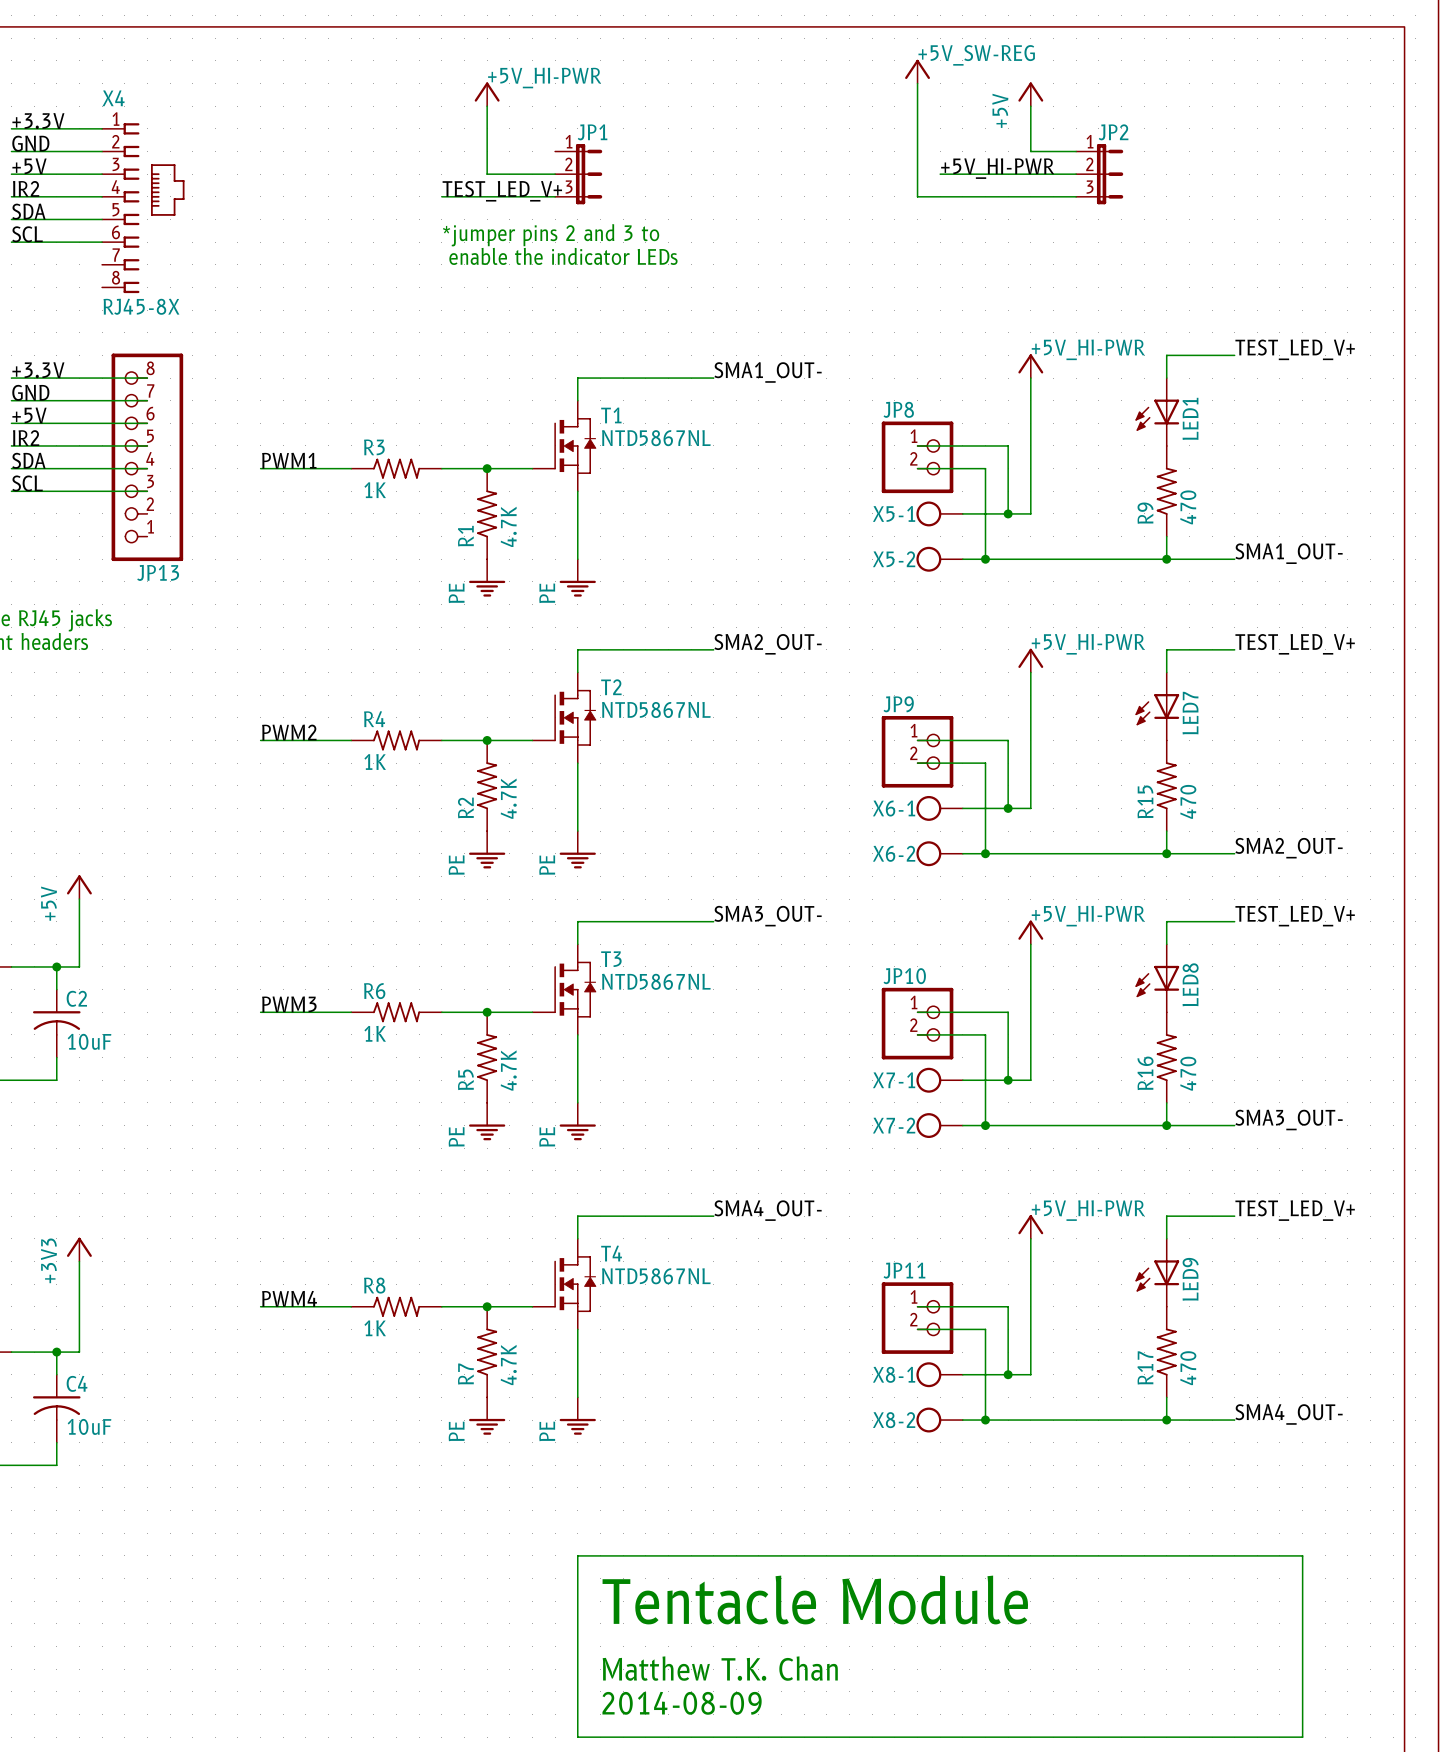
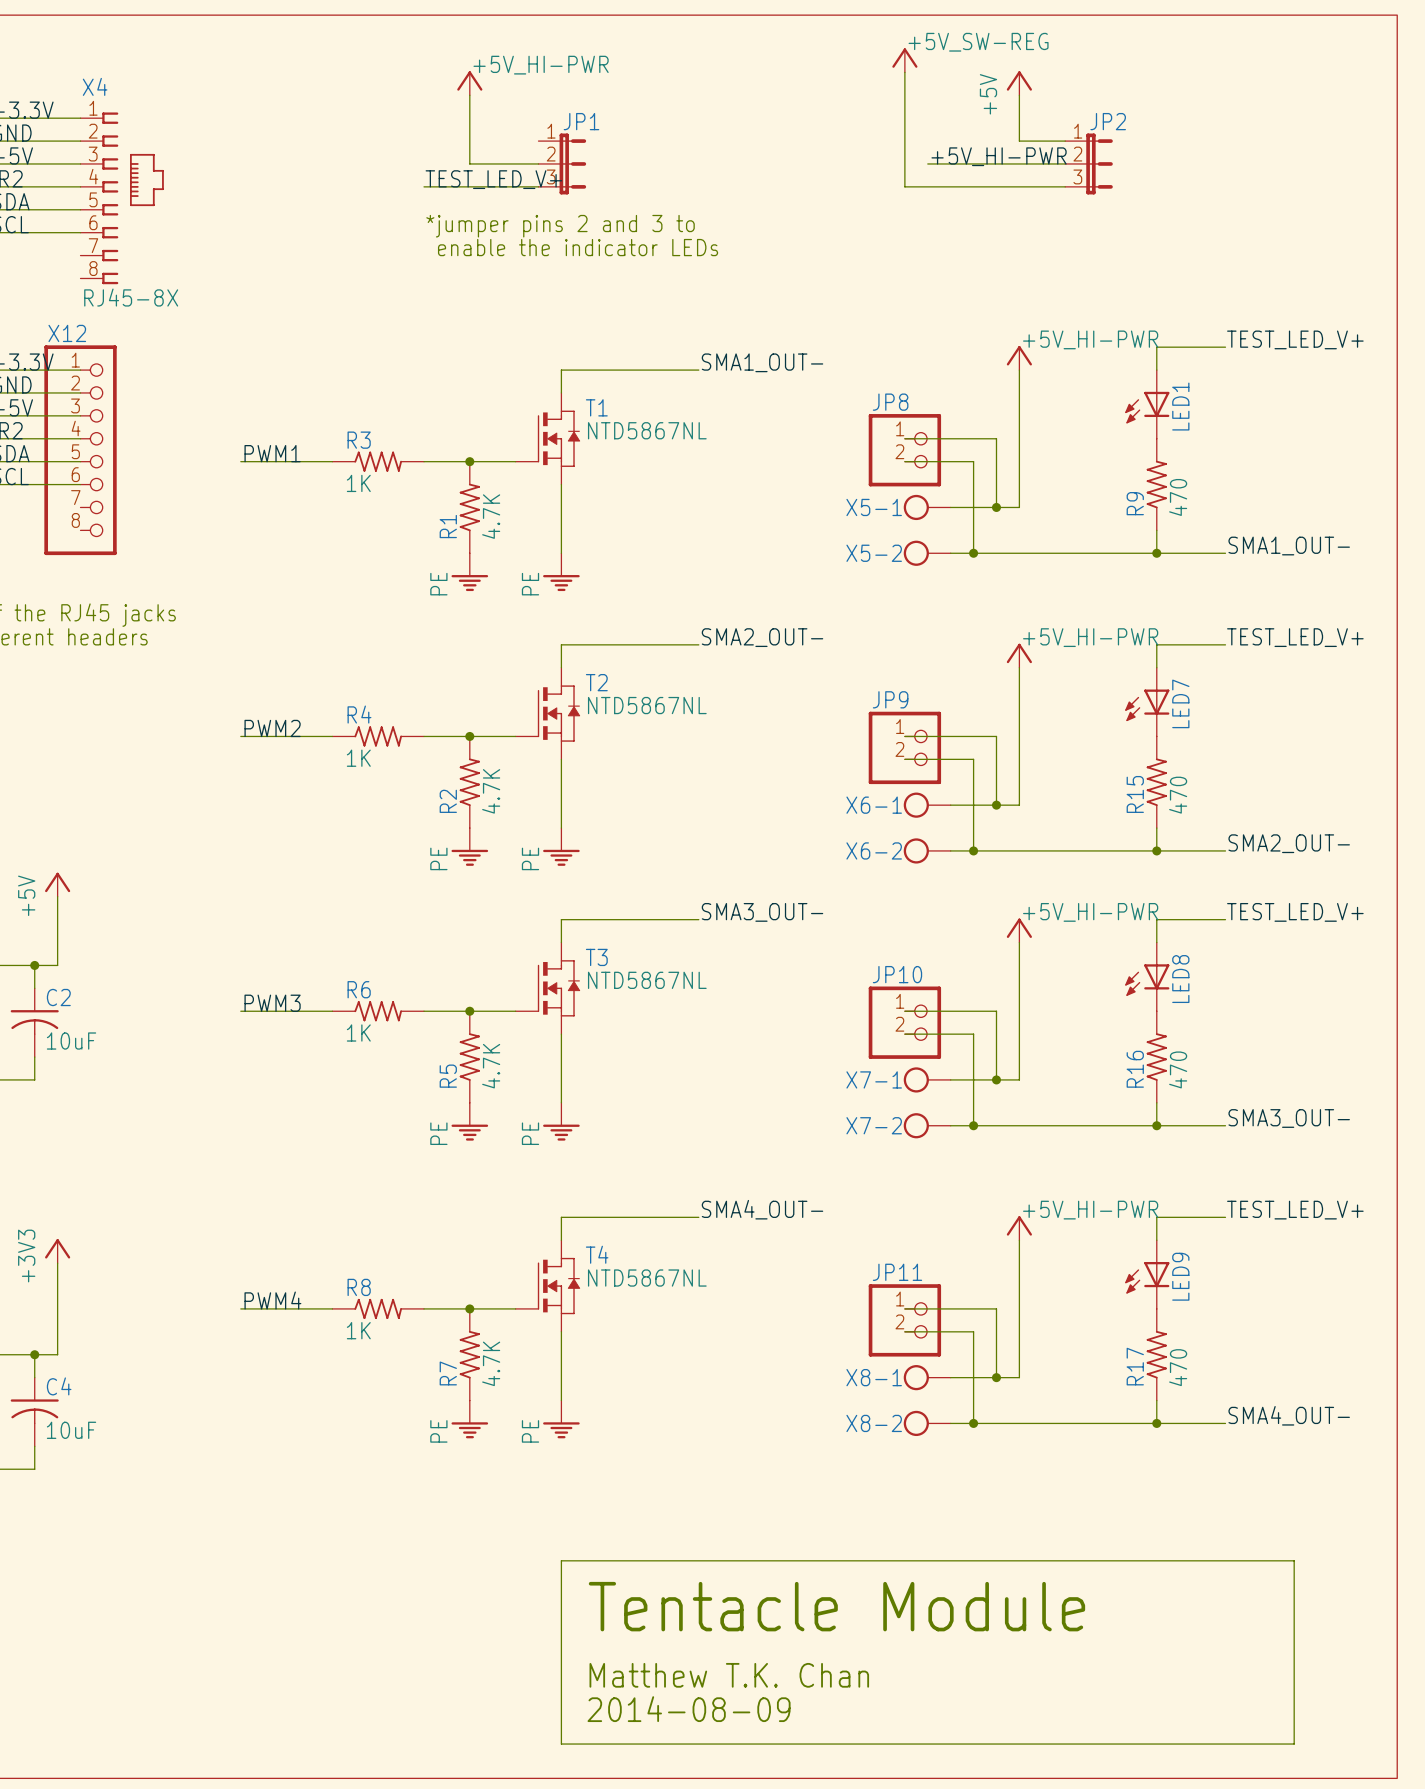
wire: (102, 378) (147, 378) -> none
wire: (102, 400) (147, 400) -> none
wire: (102, 423) (147, 423) -> none
wire: (102, 445) (147, 445) -> none
X12: none -> (80, 450)
JP13: (147, 457) -> none
wire: (102, 468) (147, 468) -> none
wire: (102, 491) (147, 491) -> none

